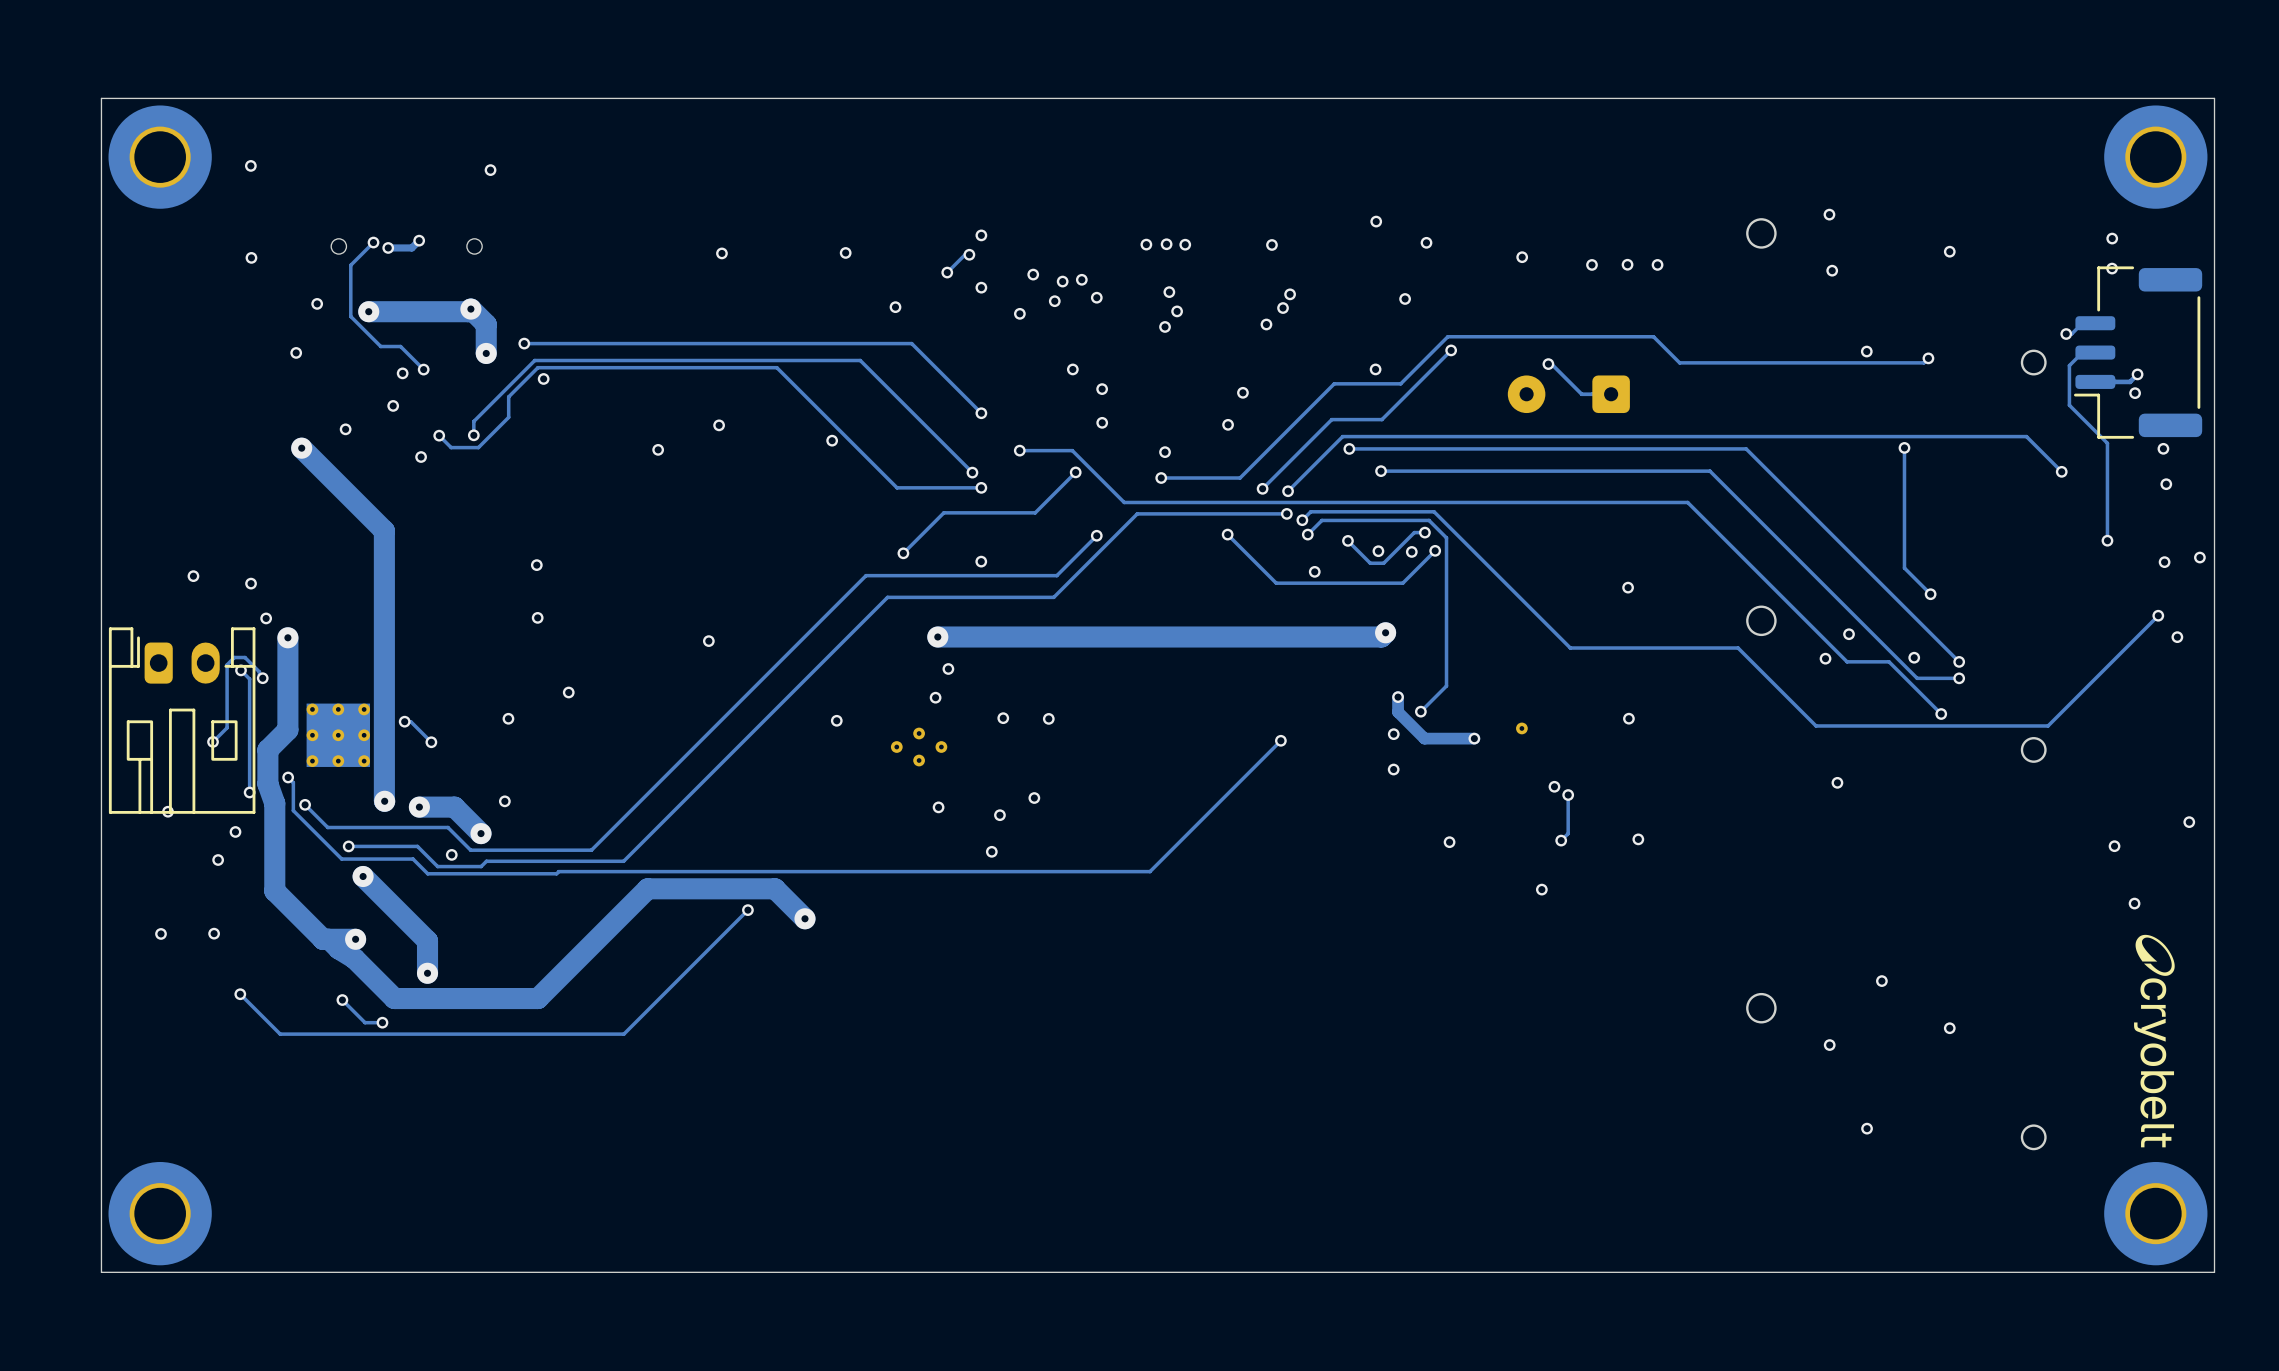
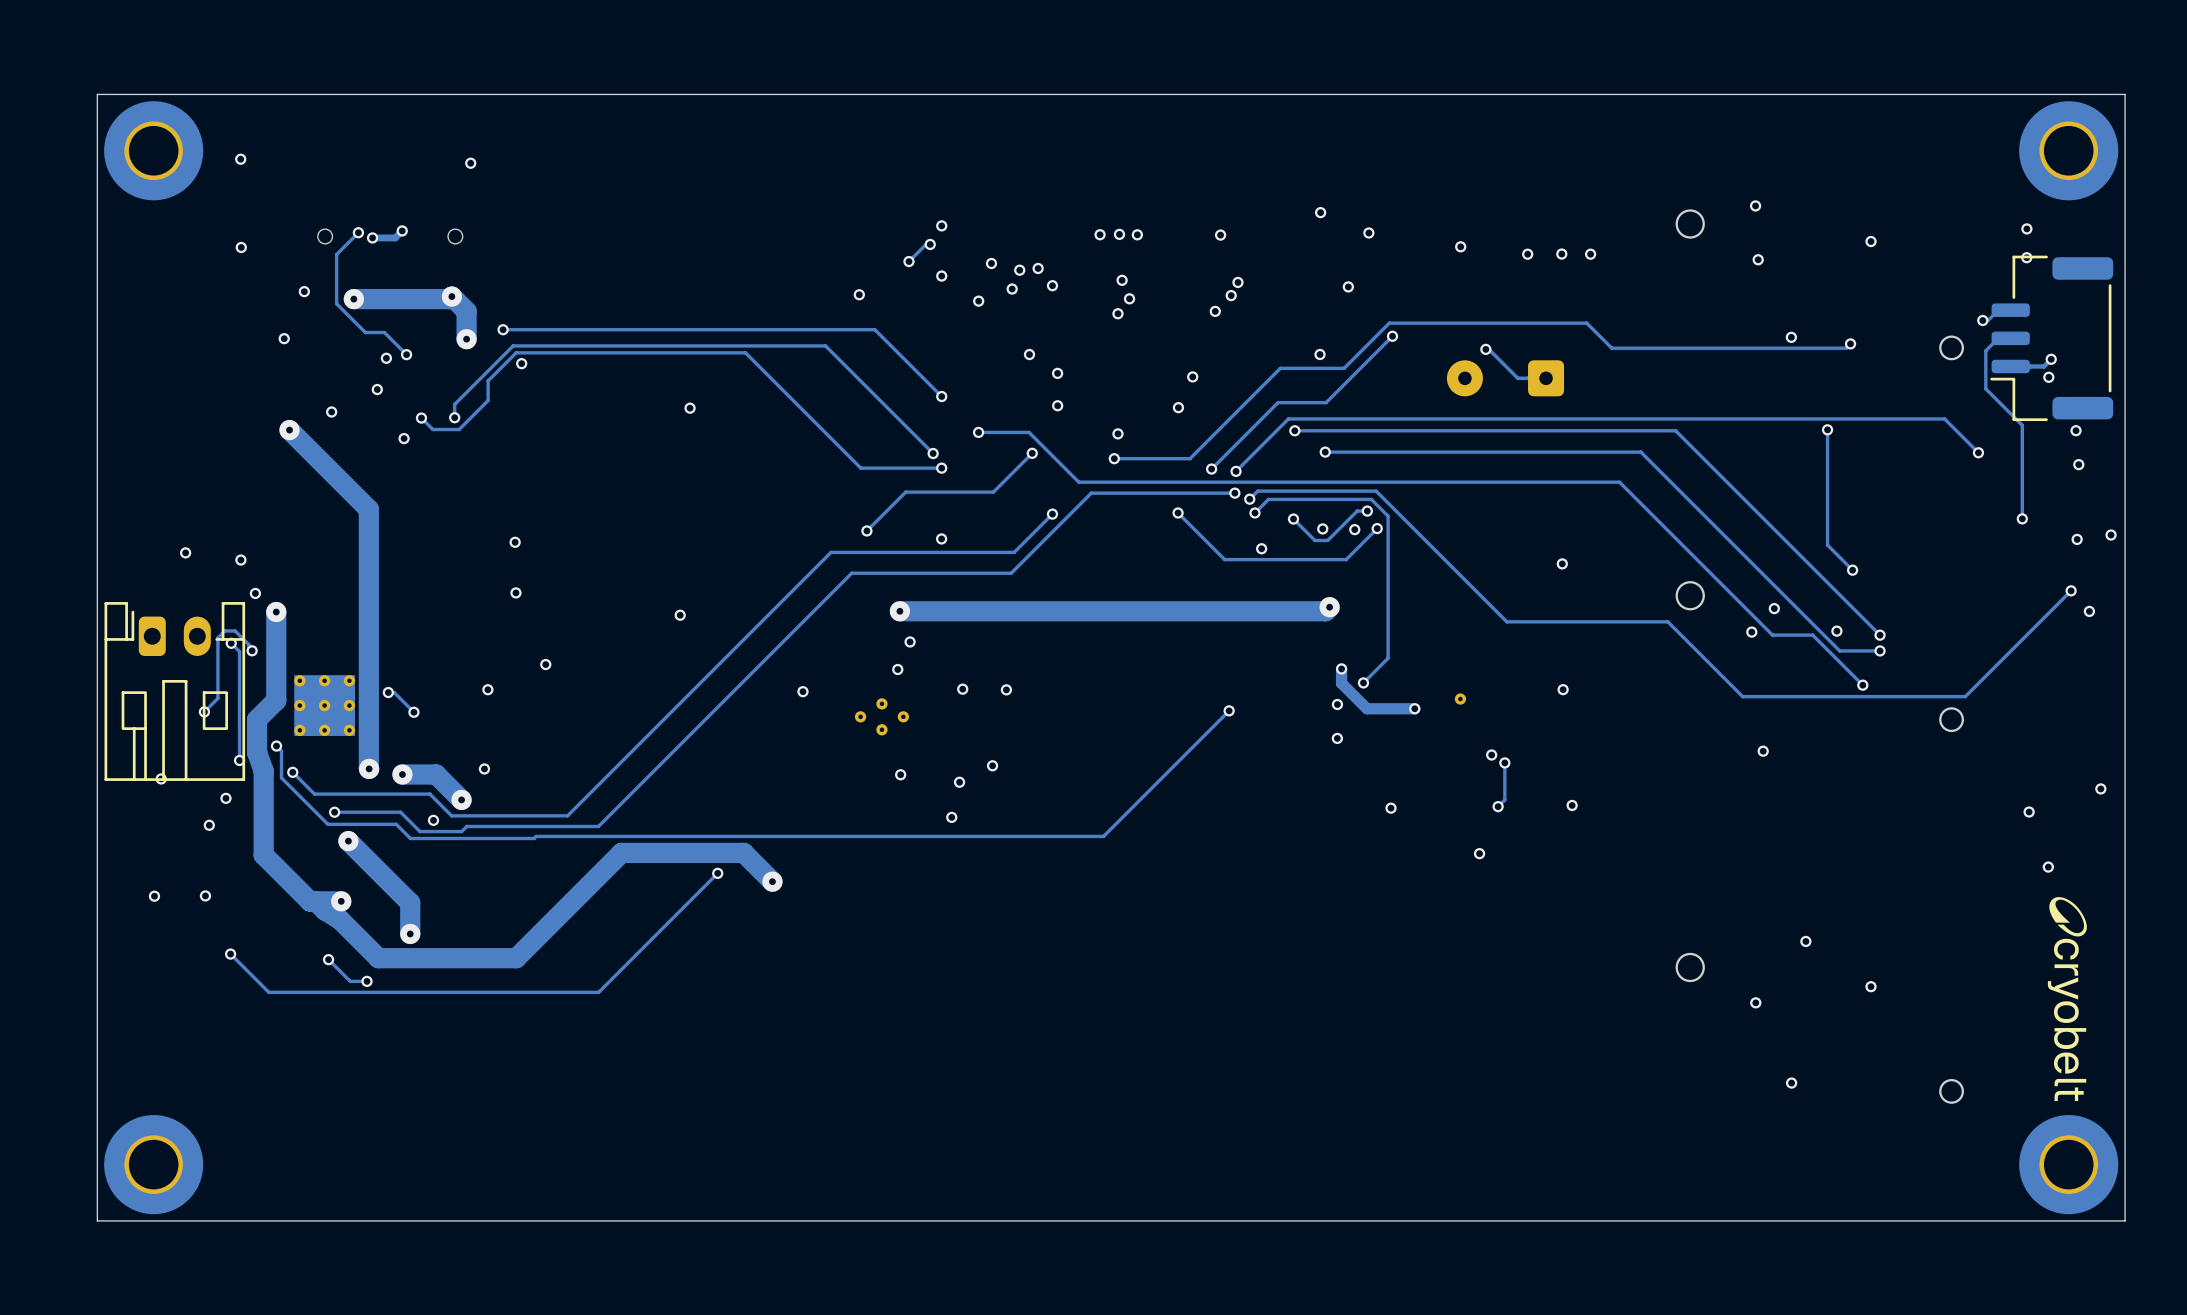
via: (845, 252) -> none
via: (721, 253) -> none
via: (832, 440) -> none
via: (658, 449) -> none

